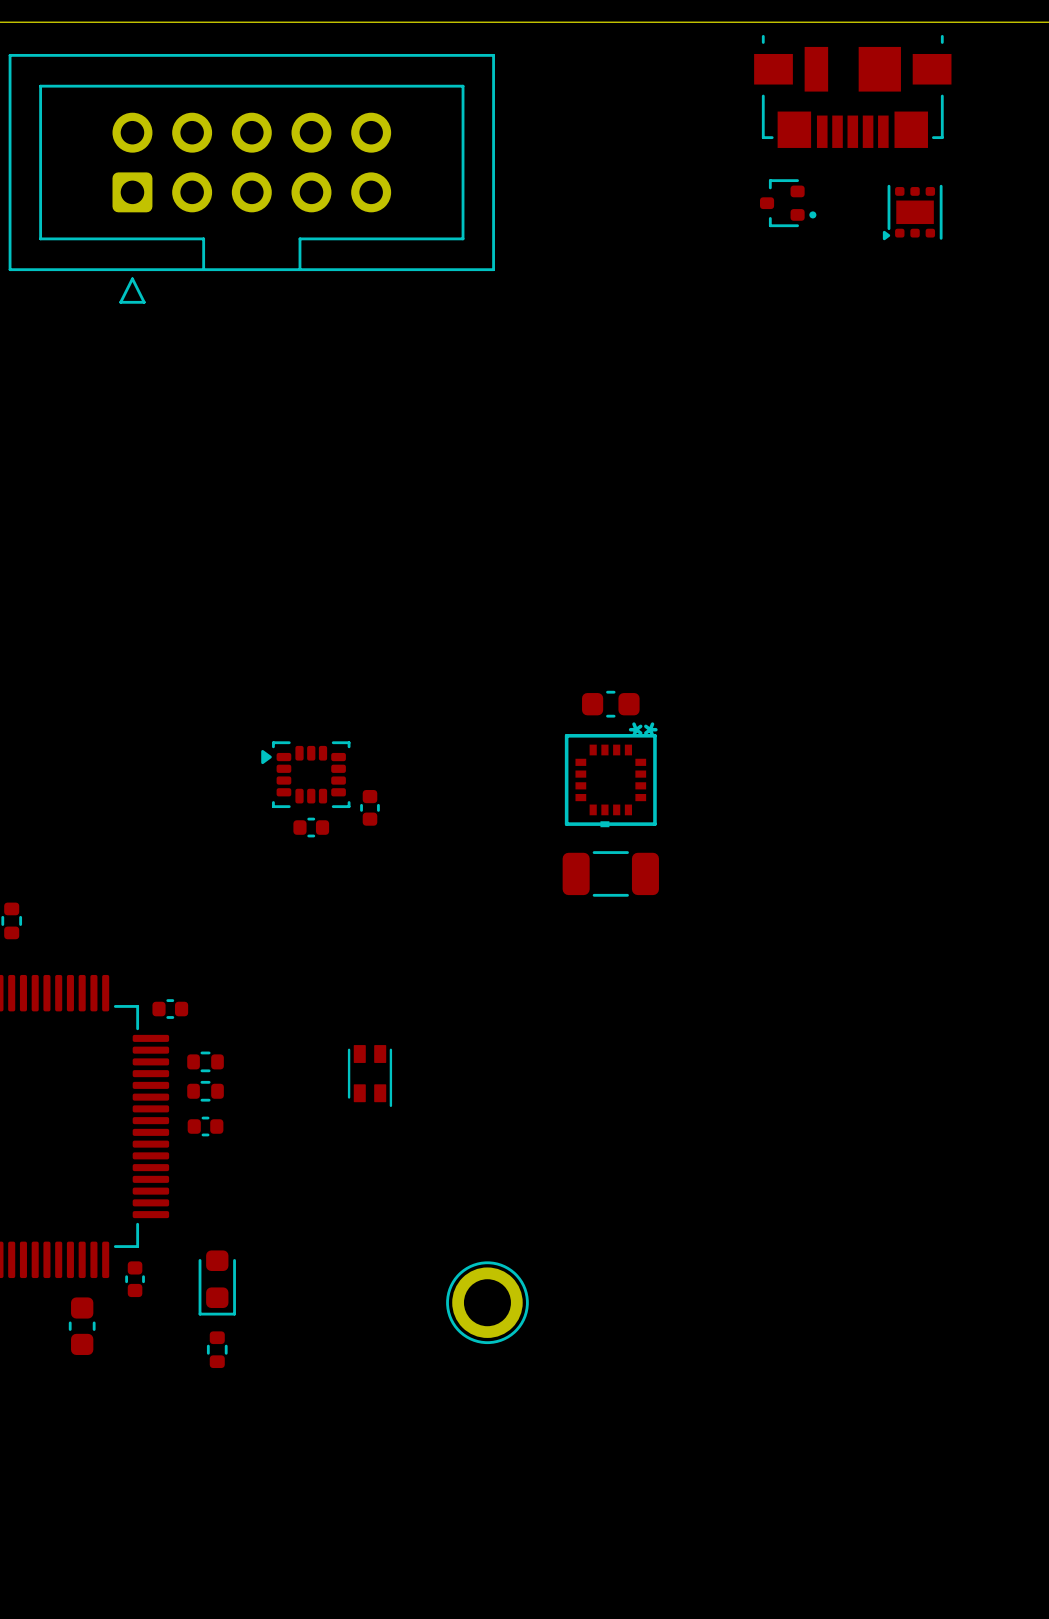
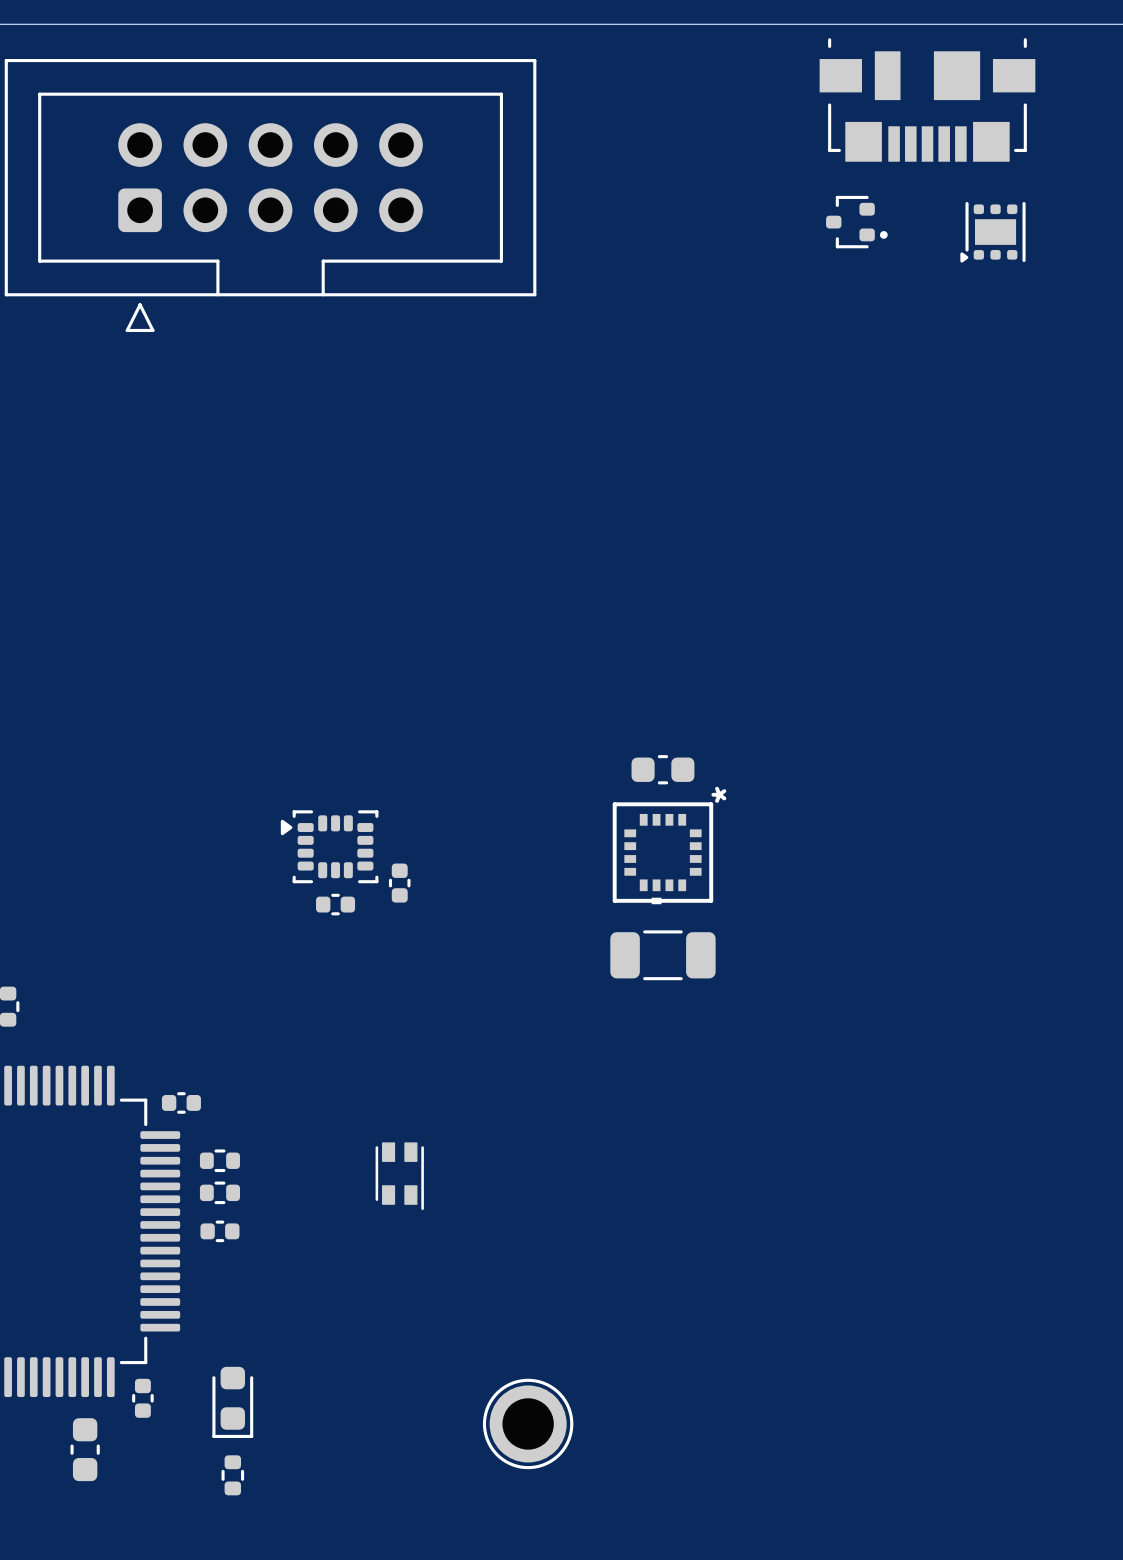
part footprint: [564, 734, 657, 828] -> [612, 802, 714, 905]

